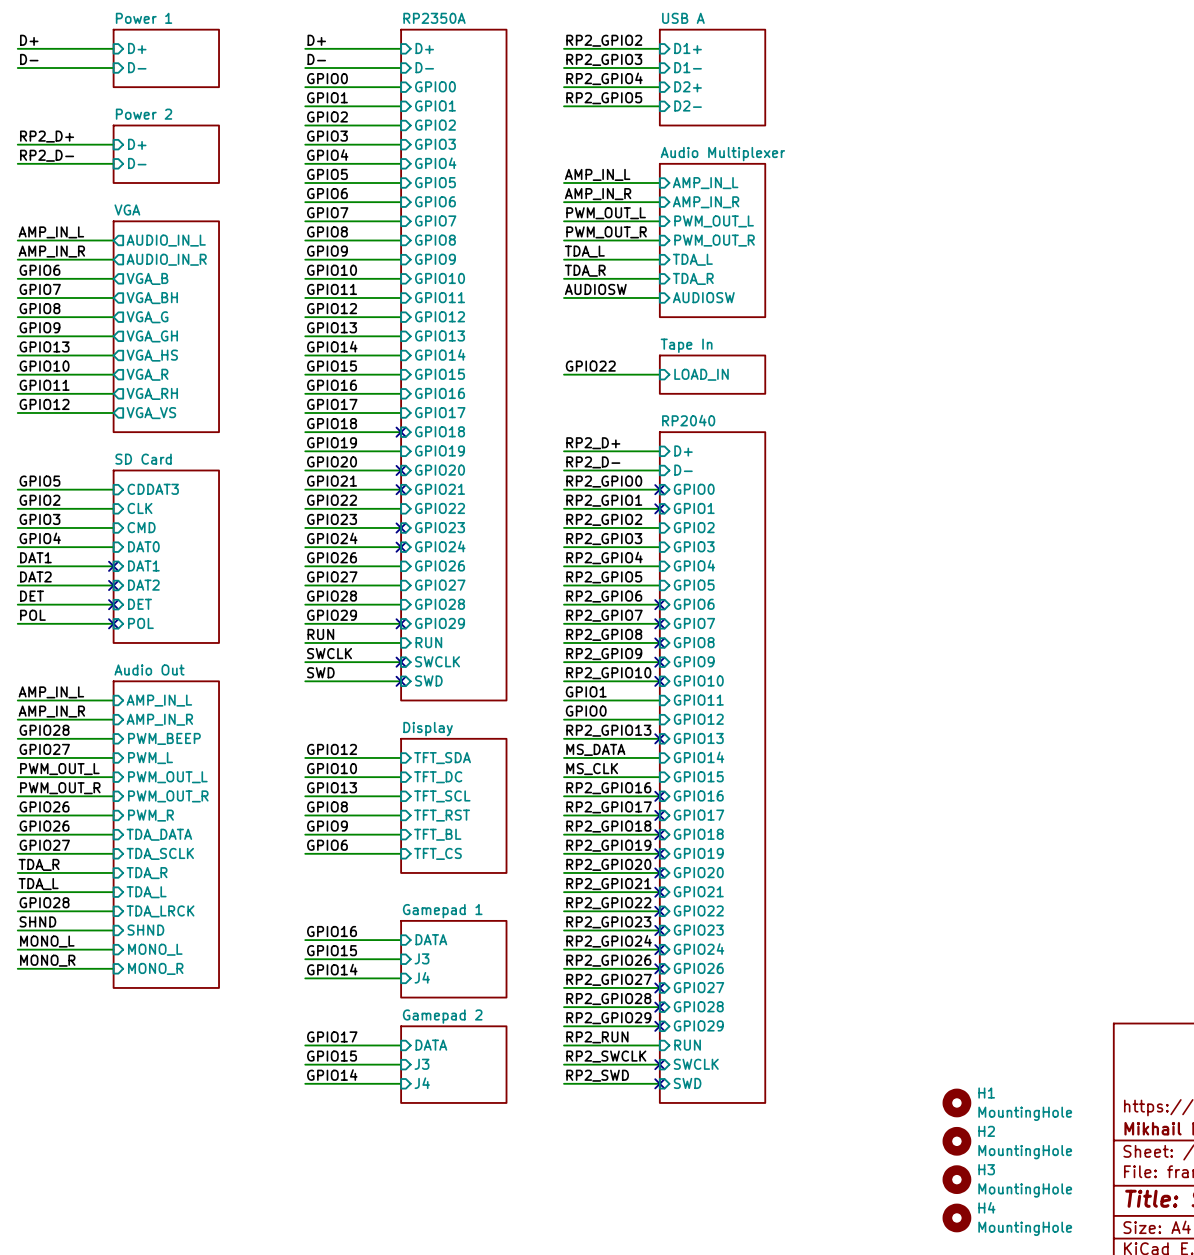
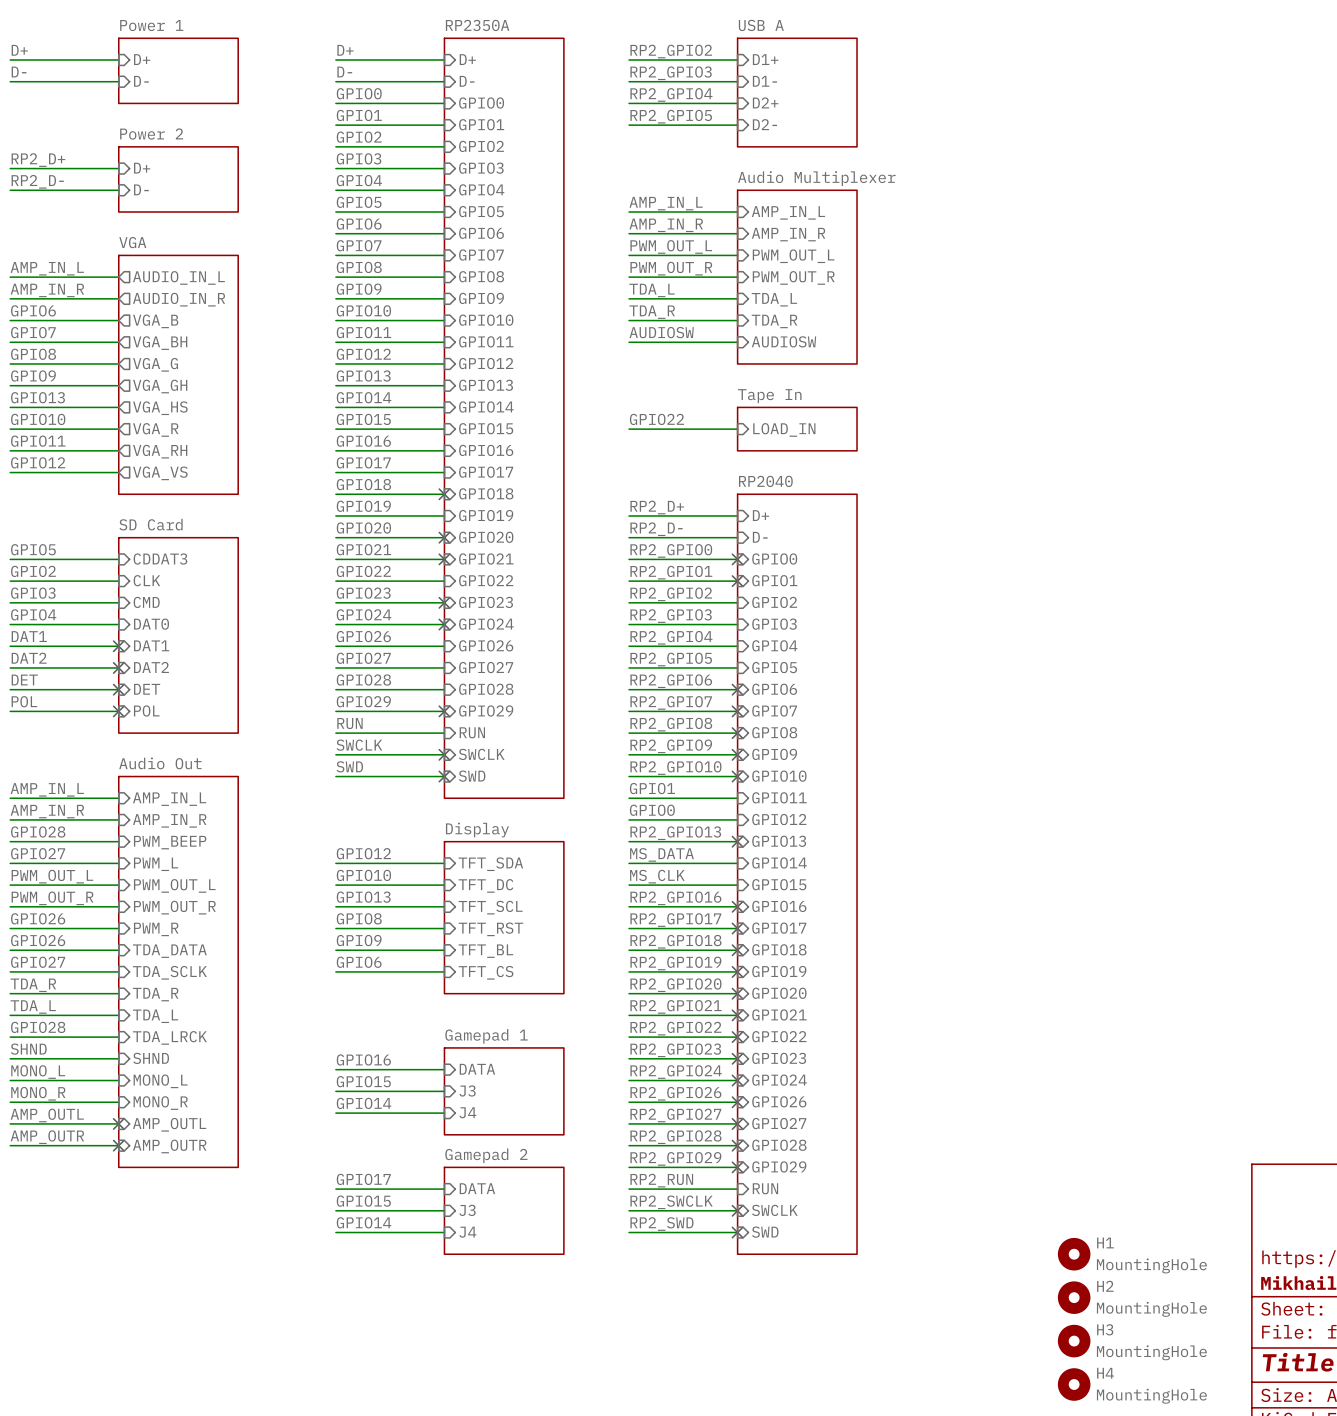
sheet Audio Out: (166, 834) -> none
sheet Audio Out: none -> (178, 971)
label: none -> AMP_OUTL (47, 1115)
wire: none -> (10, 1123) (118, 1123)
no-connect mark: none -> (118, 1123)
sheet pin: none -> AMP_OUTL (169, 1124)
label: none -> AMP_OUTR (47, 1137)
wire: none -> (10, 1145) (118, 1145)
no-connect mark: none -> (118, 1145)
sheet pin: none -> AMP_OUTR (169, 1146)

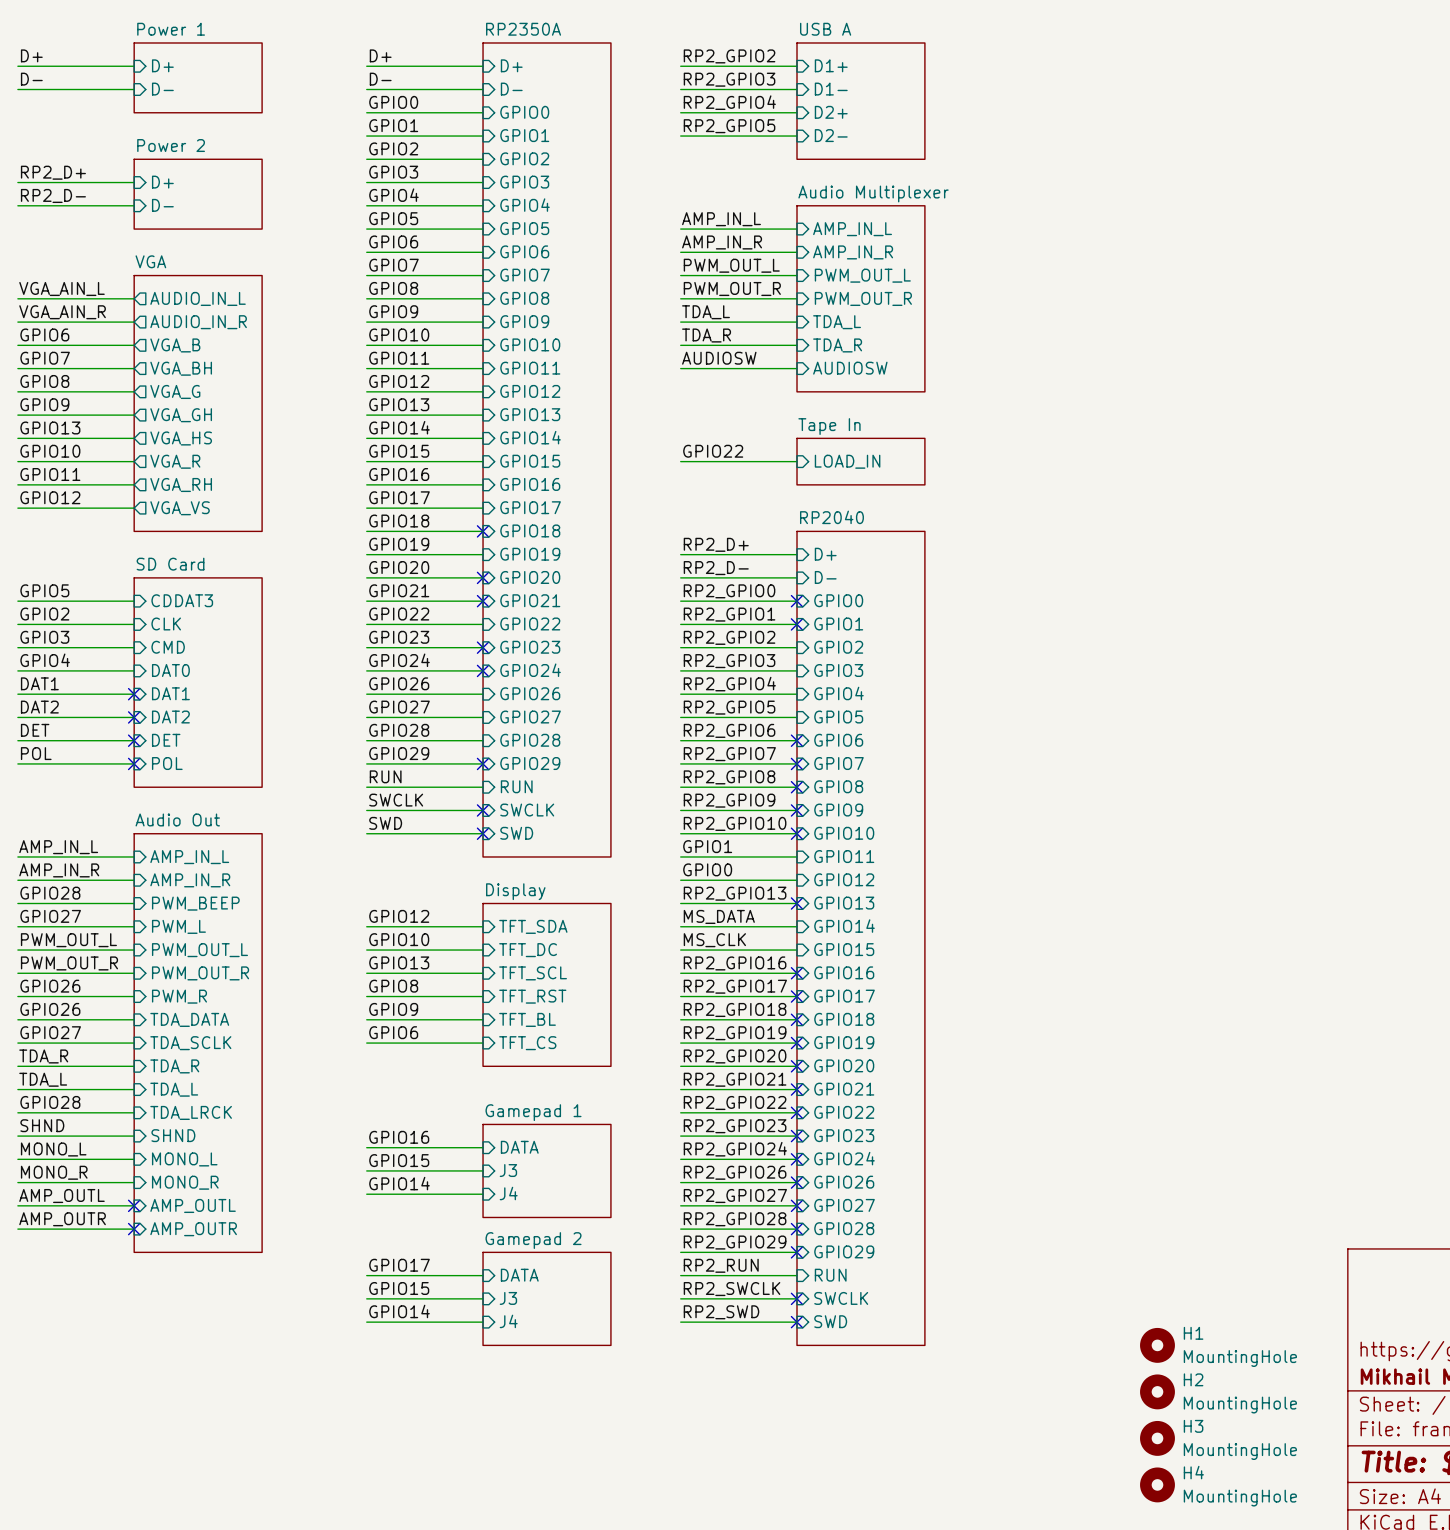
label: AMP_IN_L (47, 268) -> VGA_AIN_L (62, 289)
label: AMP_IN_R (47, 290) -> VGA_AIN_R (62, 312)

